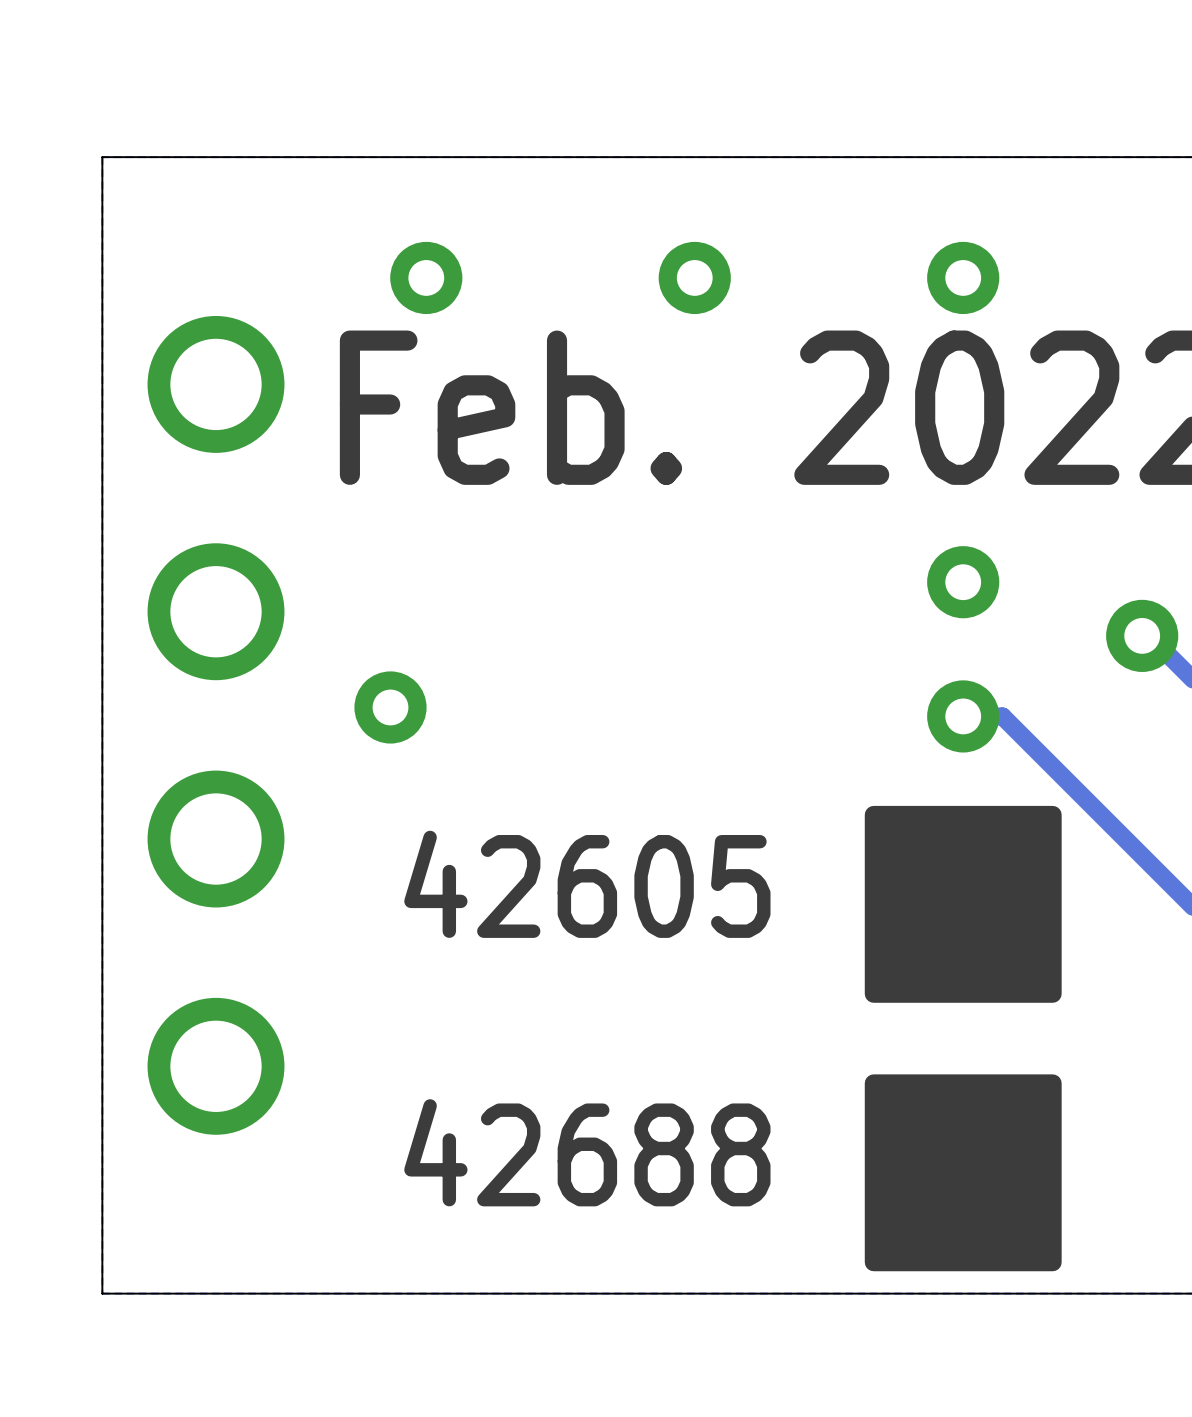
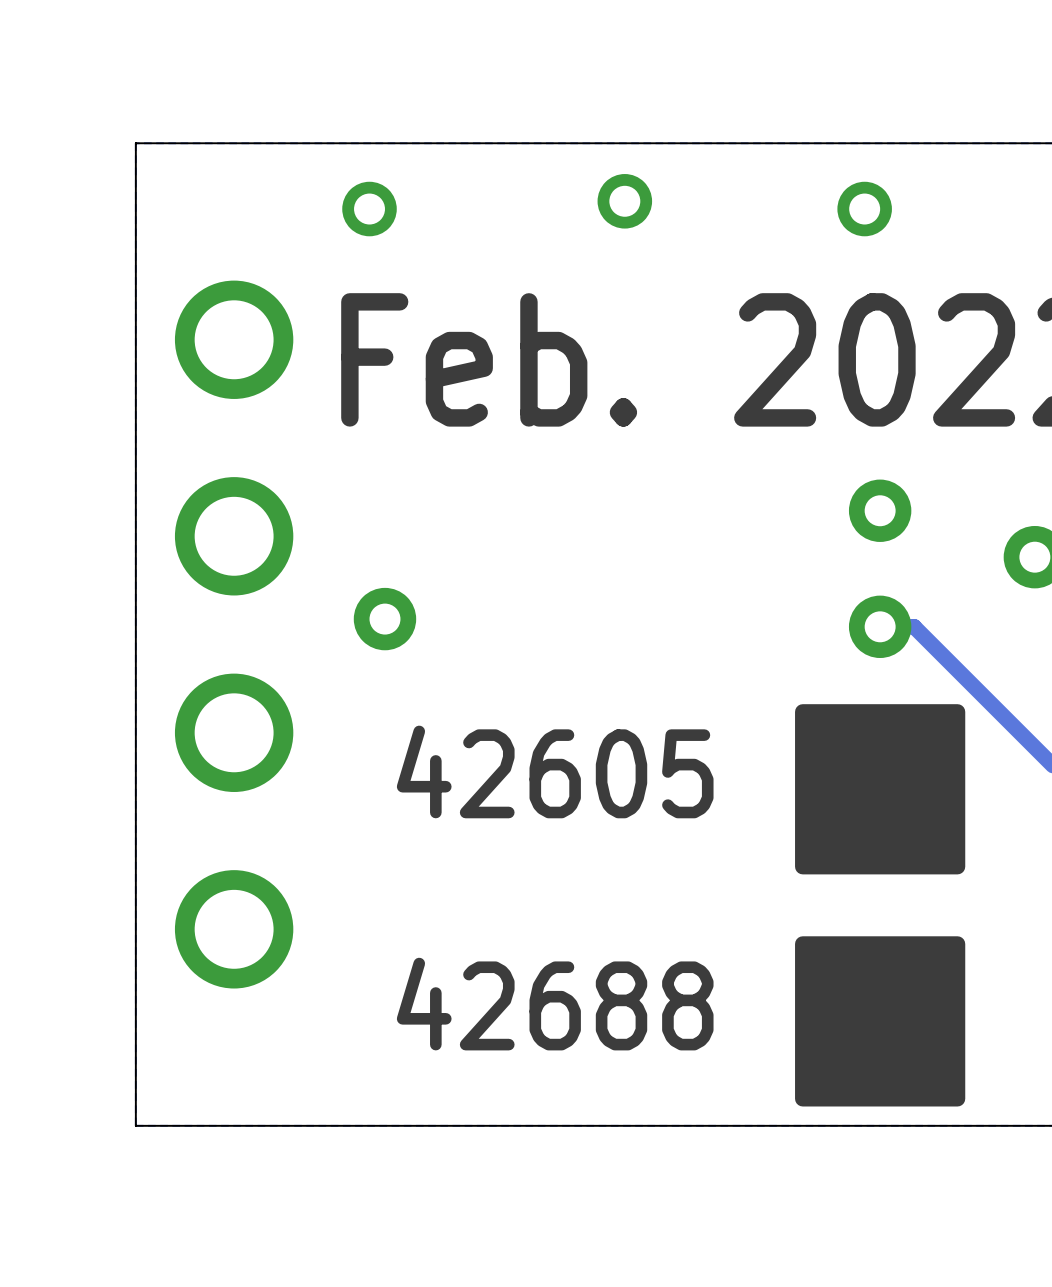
via position: (426, 277) -> (369, 209)
via position: (694, 277) -> (624, 201)
via position: (963, 277) -> (864, 209)

